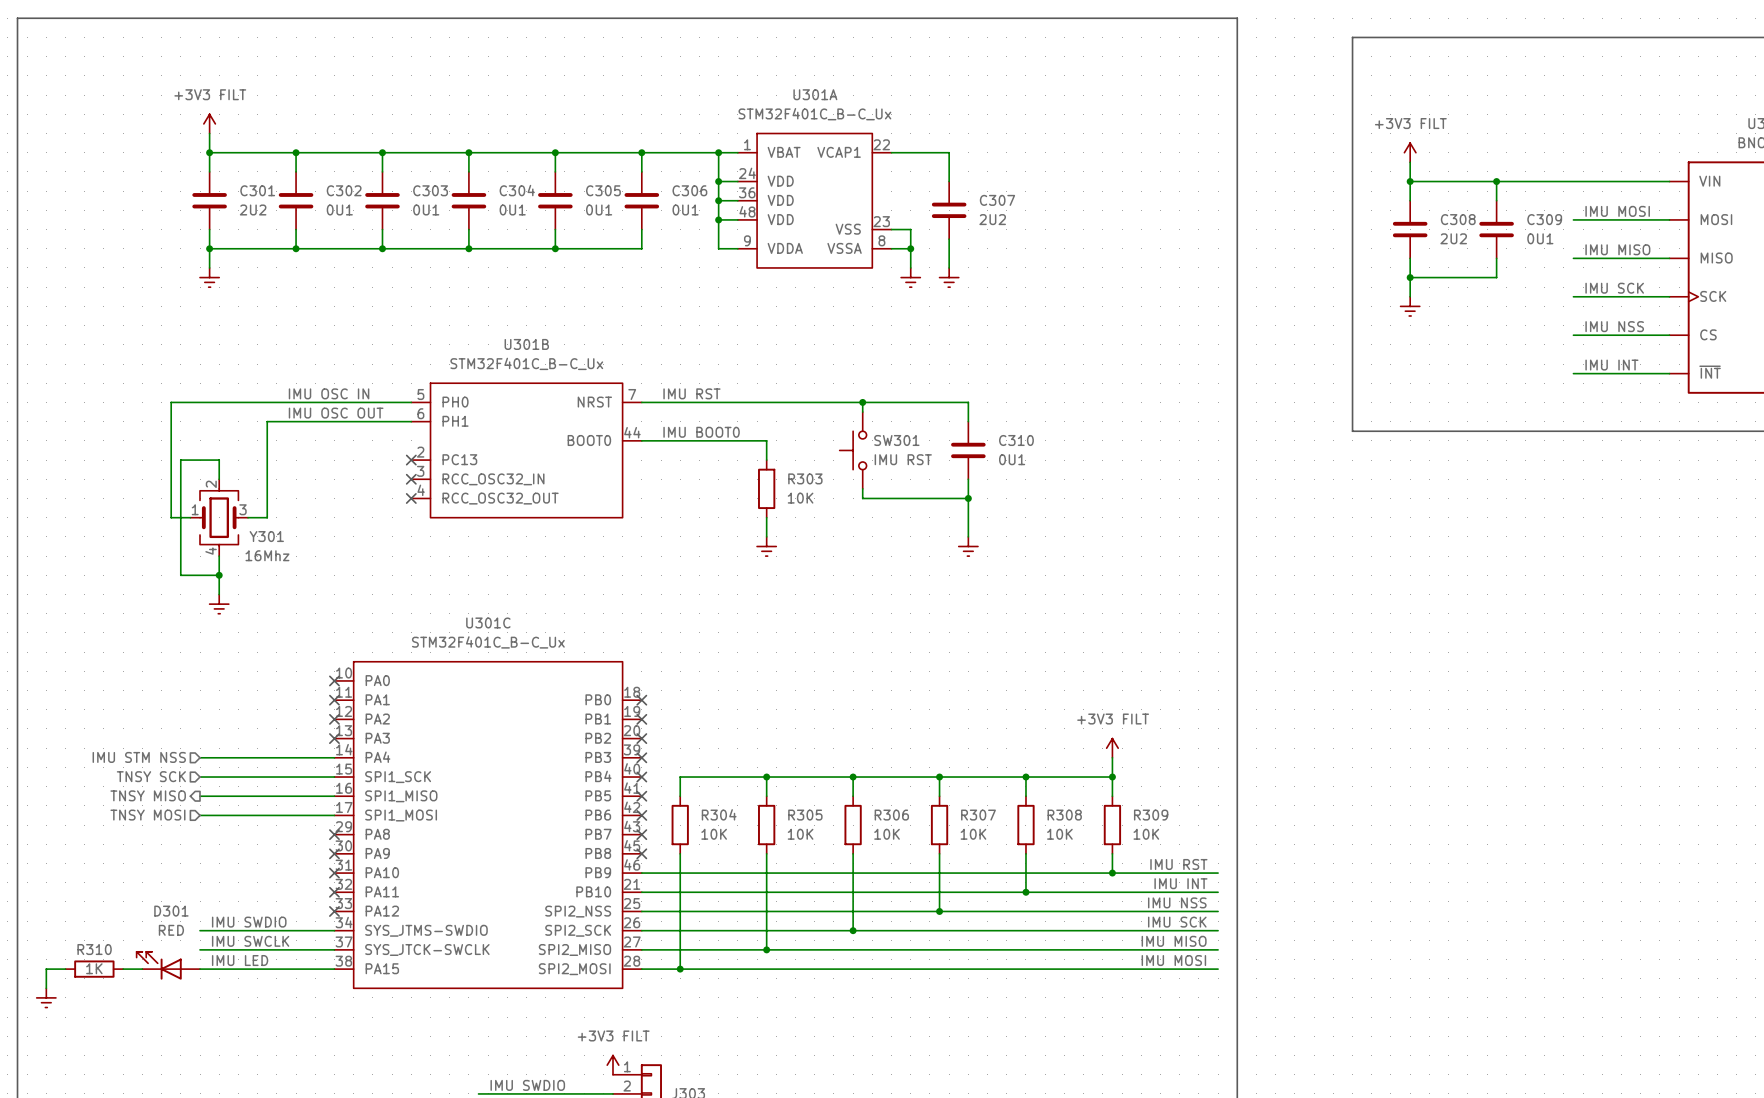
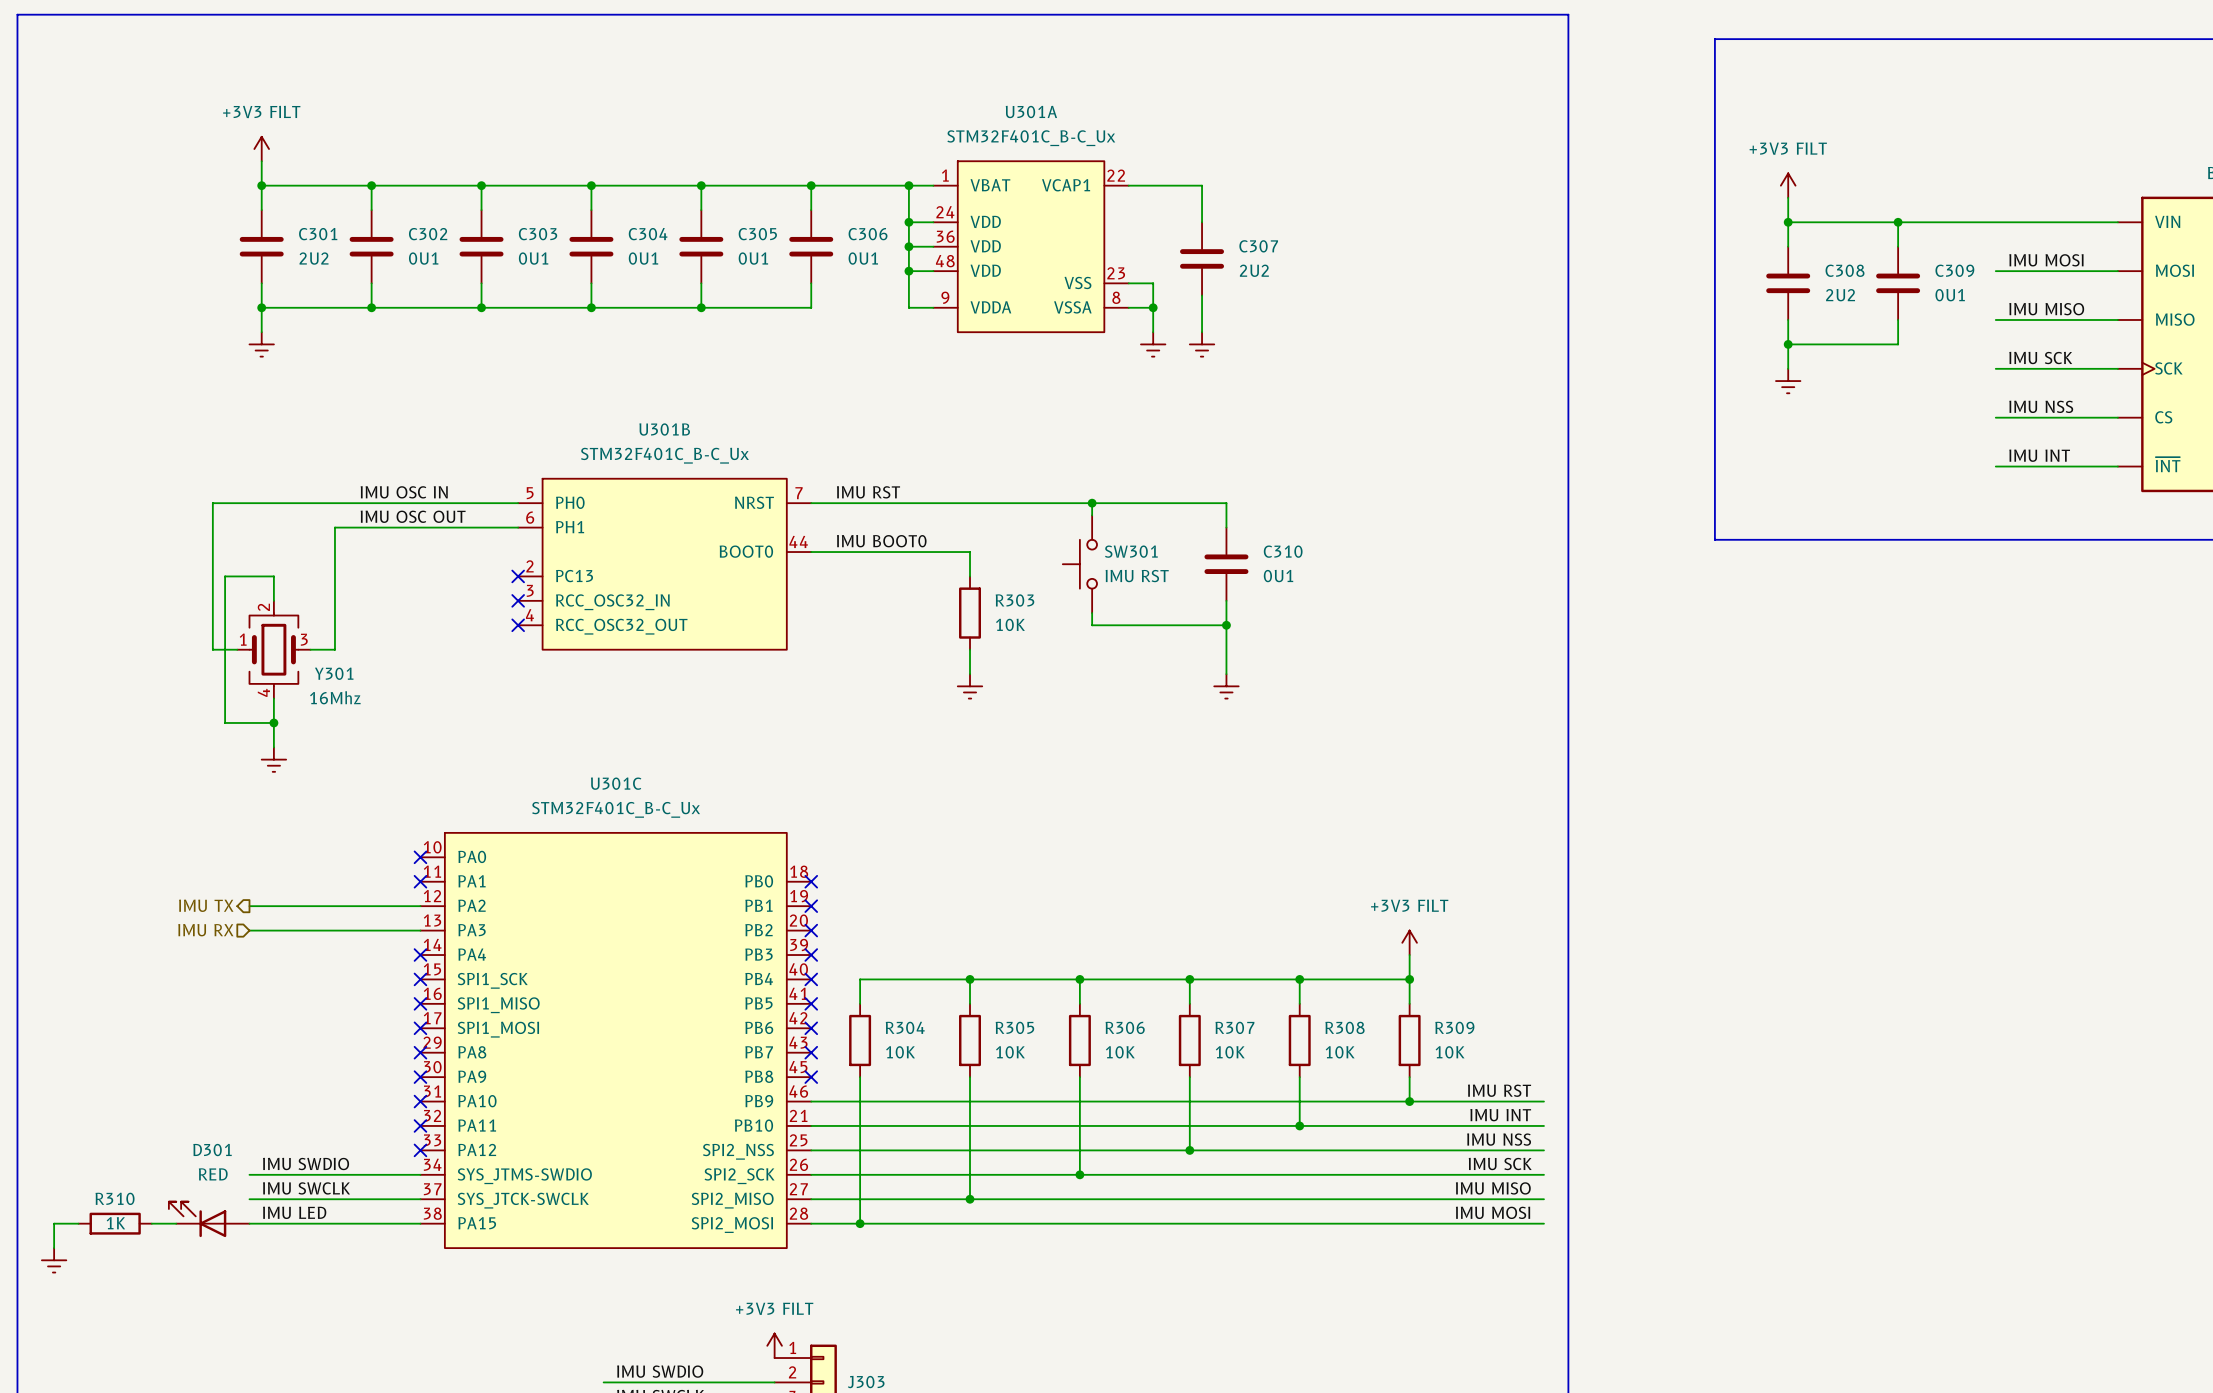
hierarchical label: none -> IMU TX (206, 905)
no-connect mark: (334, 719) -> none
hierarchical label: none -> IMU RX (205, 930)
no-connect mark: (334, 738) -> none
hierarchical label: IMU STM NSS (139, 757) -> none
wire: (200, 757) (334, 757) -> (249, 906) (420, 906)
no-connect mark: none -> (420, 955)
hierarchical label: TNSY SCK (151, 776) -> none
wire: (200, 777) (334, 777) -> (249, 930) (420, 930)
no-connect mark: none -> (420, 979)
hierarchical label: TNSY MISO (148, 795) -> none
wire: (200, 796) (334, 796) -> none
no-connect mark: none -> (420, 1003)
hierarchical label: TNSY MOSI (147, 815) -> none
wire: (200, 815) (334, 815) -> none
no-connect mark: none -> (420, 1028)

